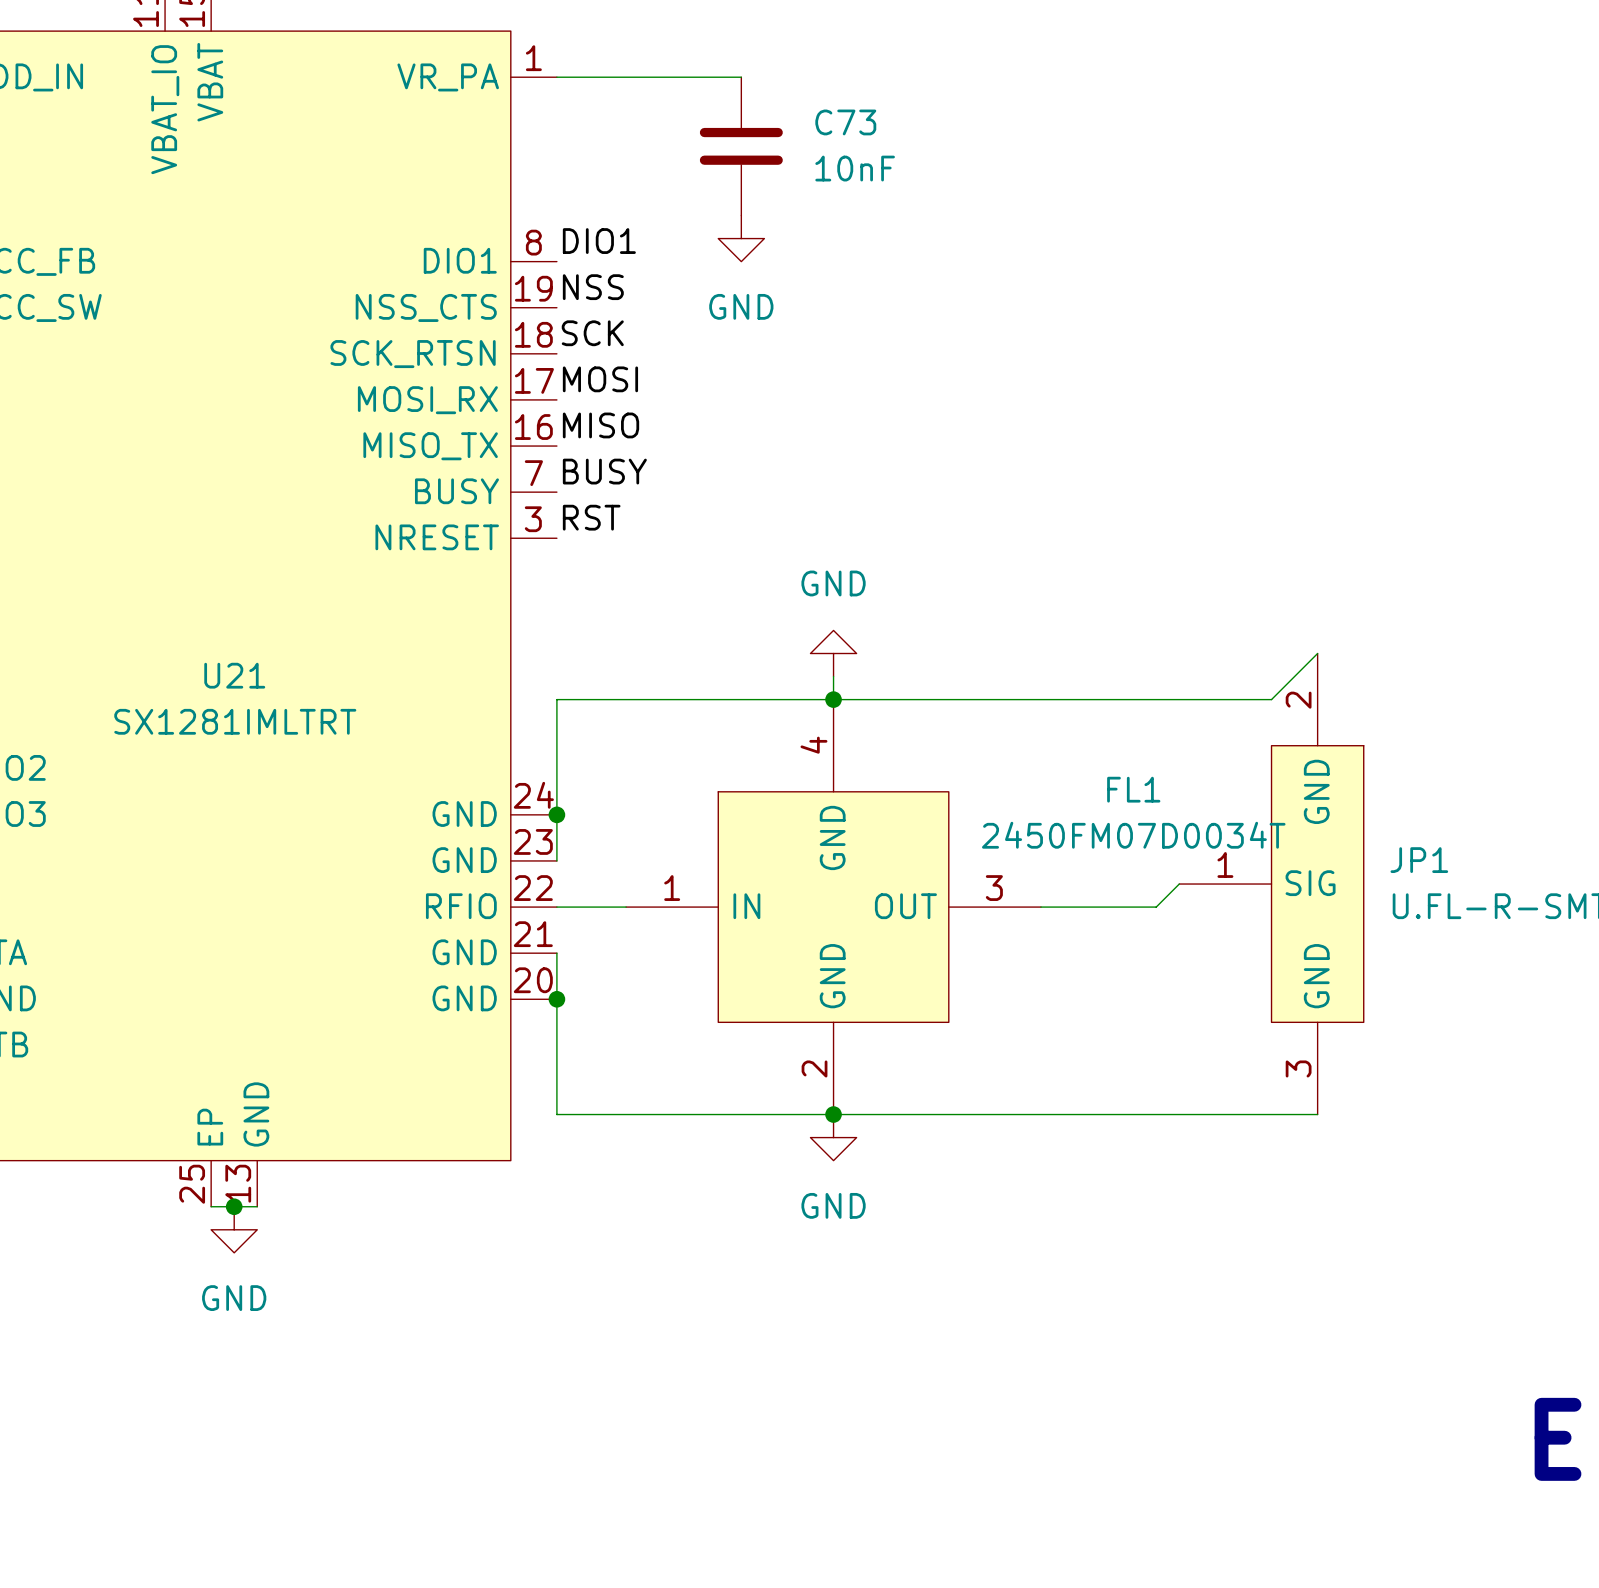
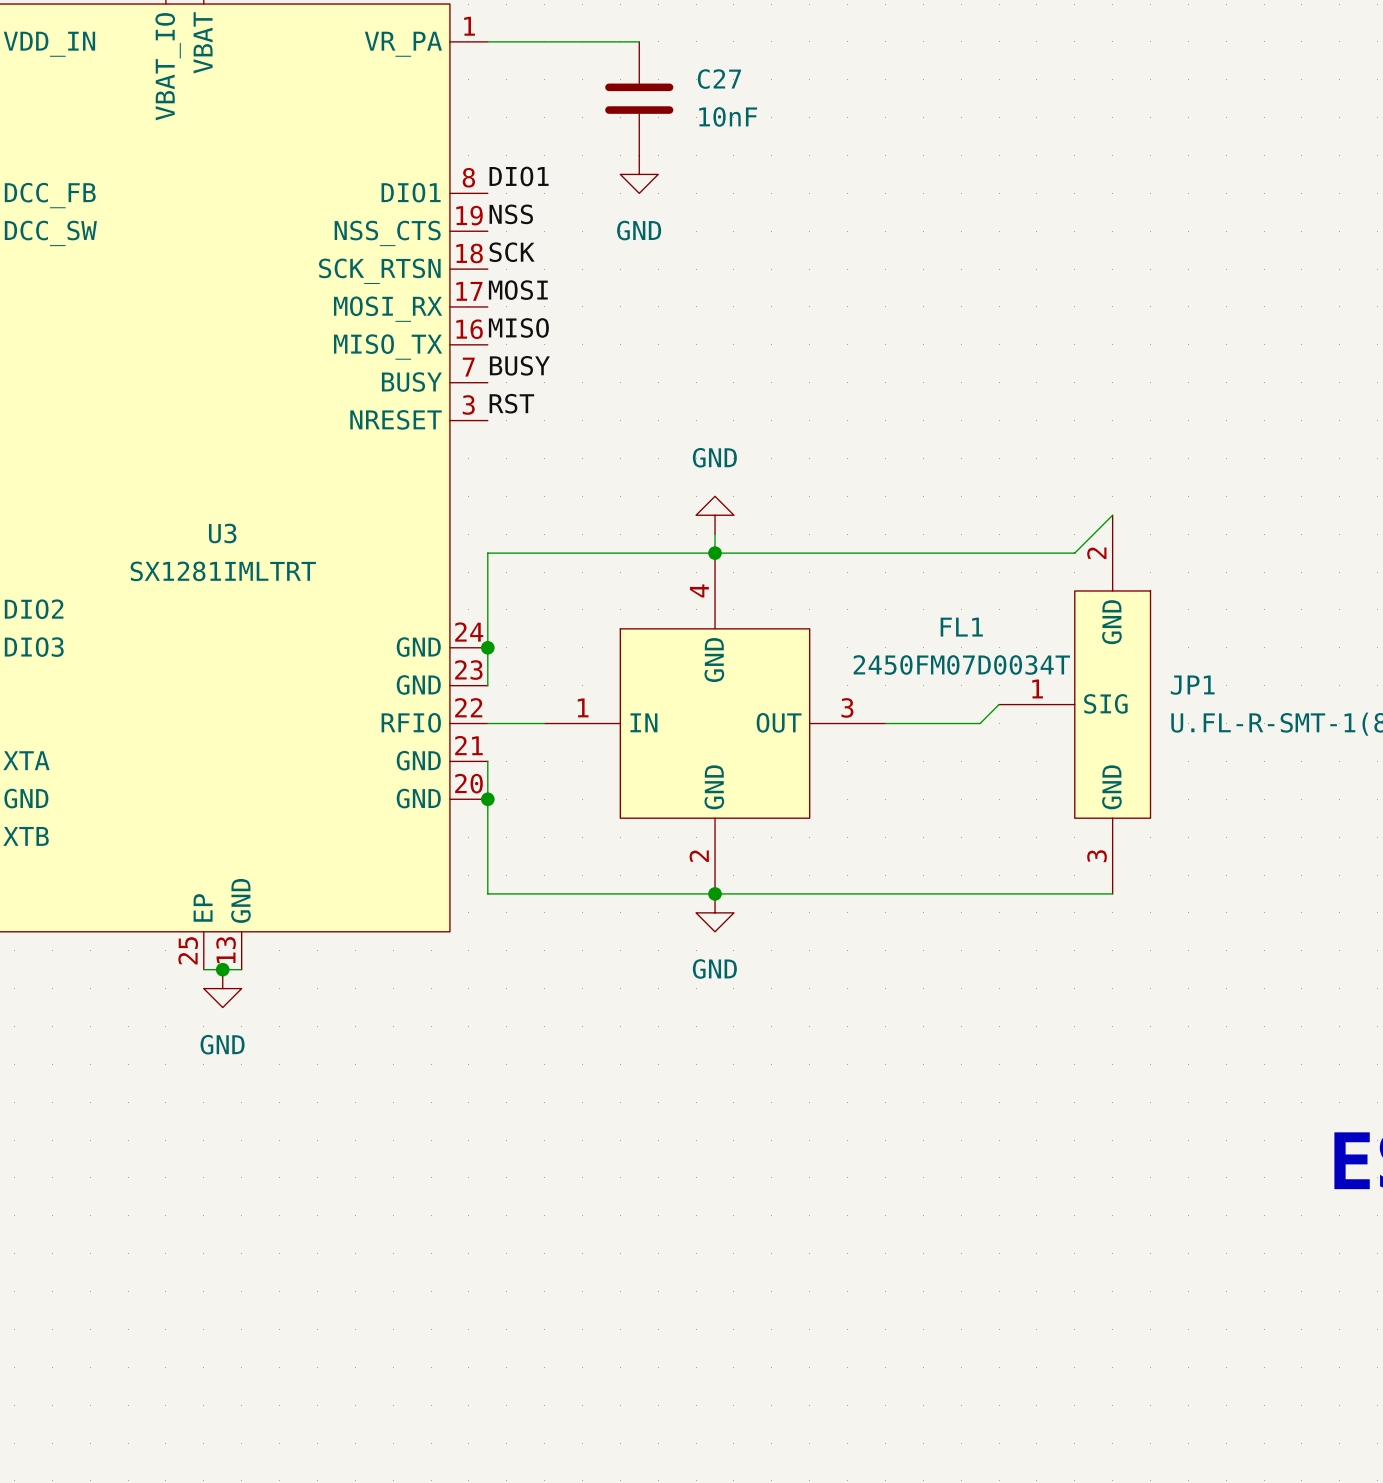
C73 name: C73 (845, 122) -> C27 (719, 79)
U21 name: U21 (234, 675) -> U3 (222, 533)

